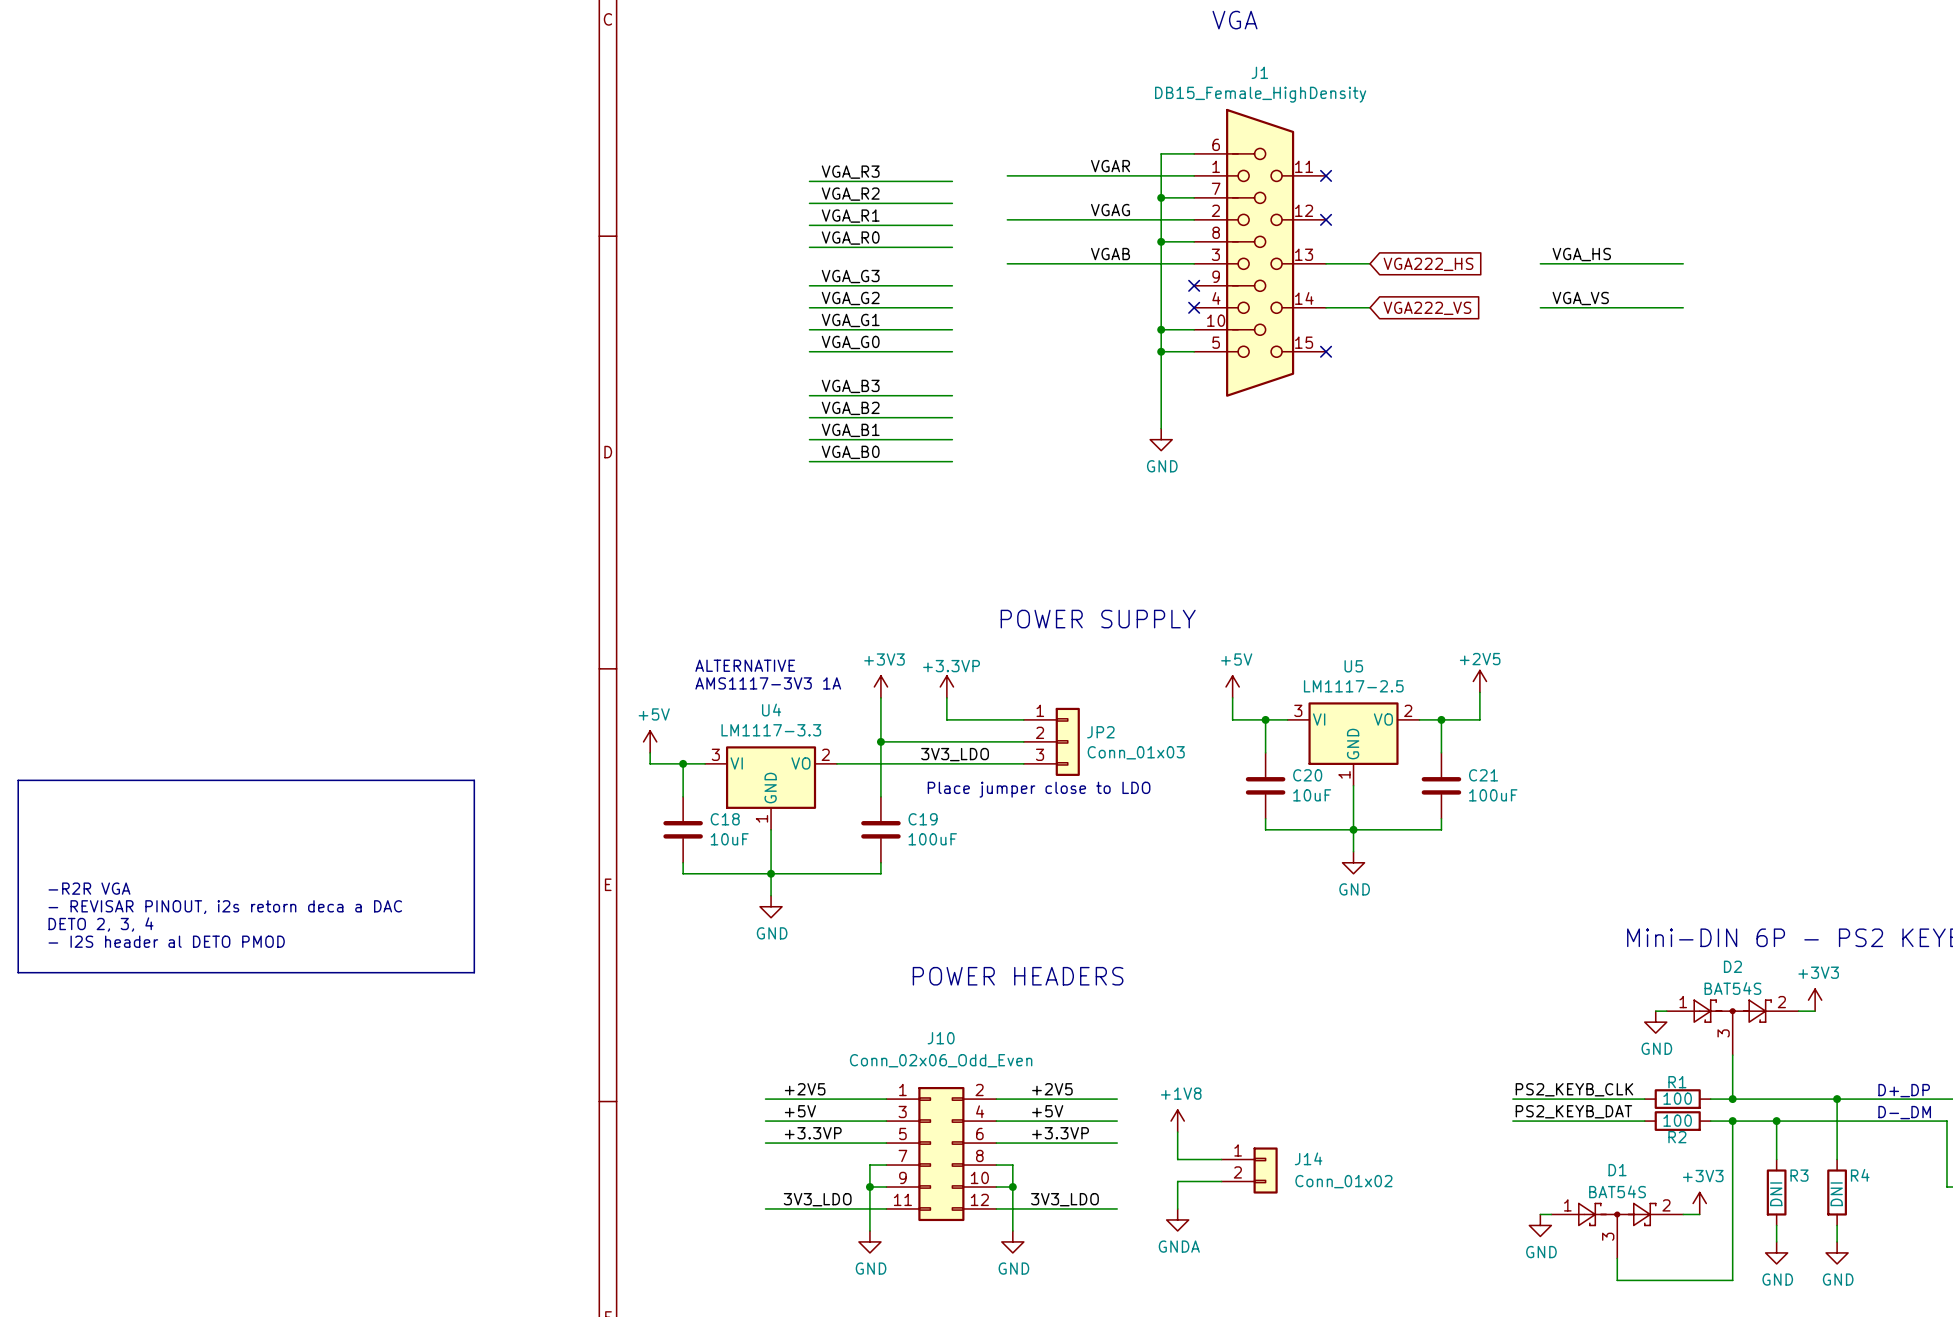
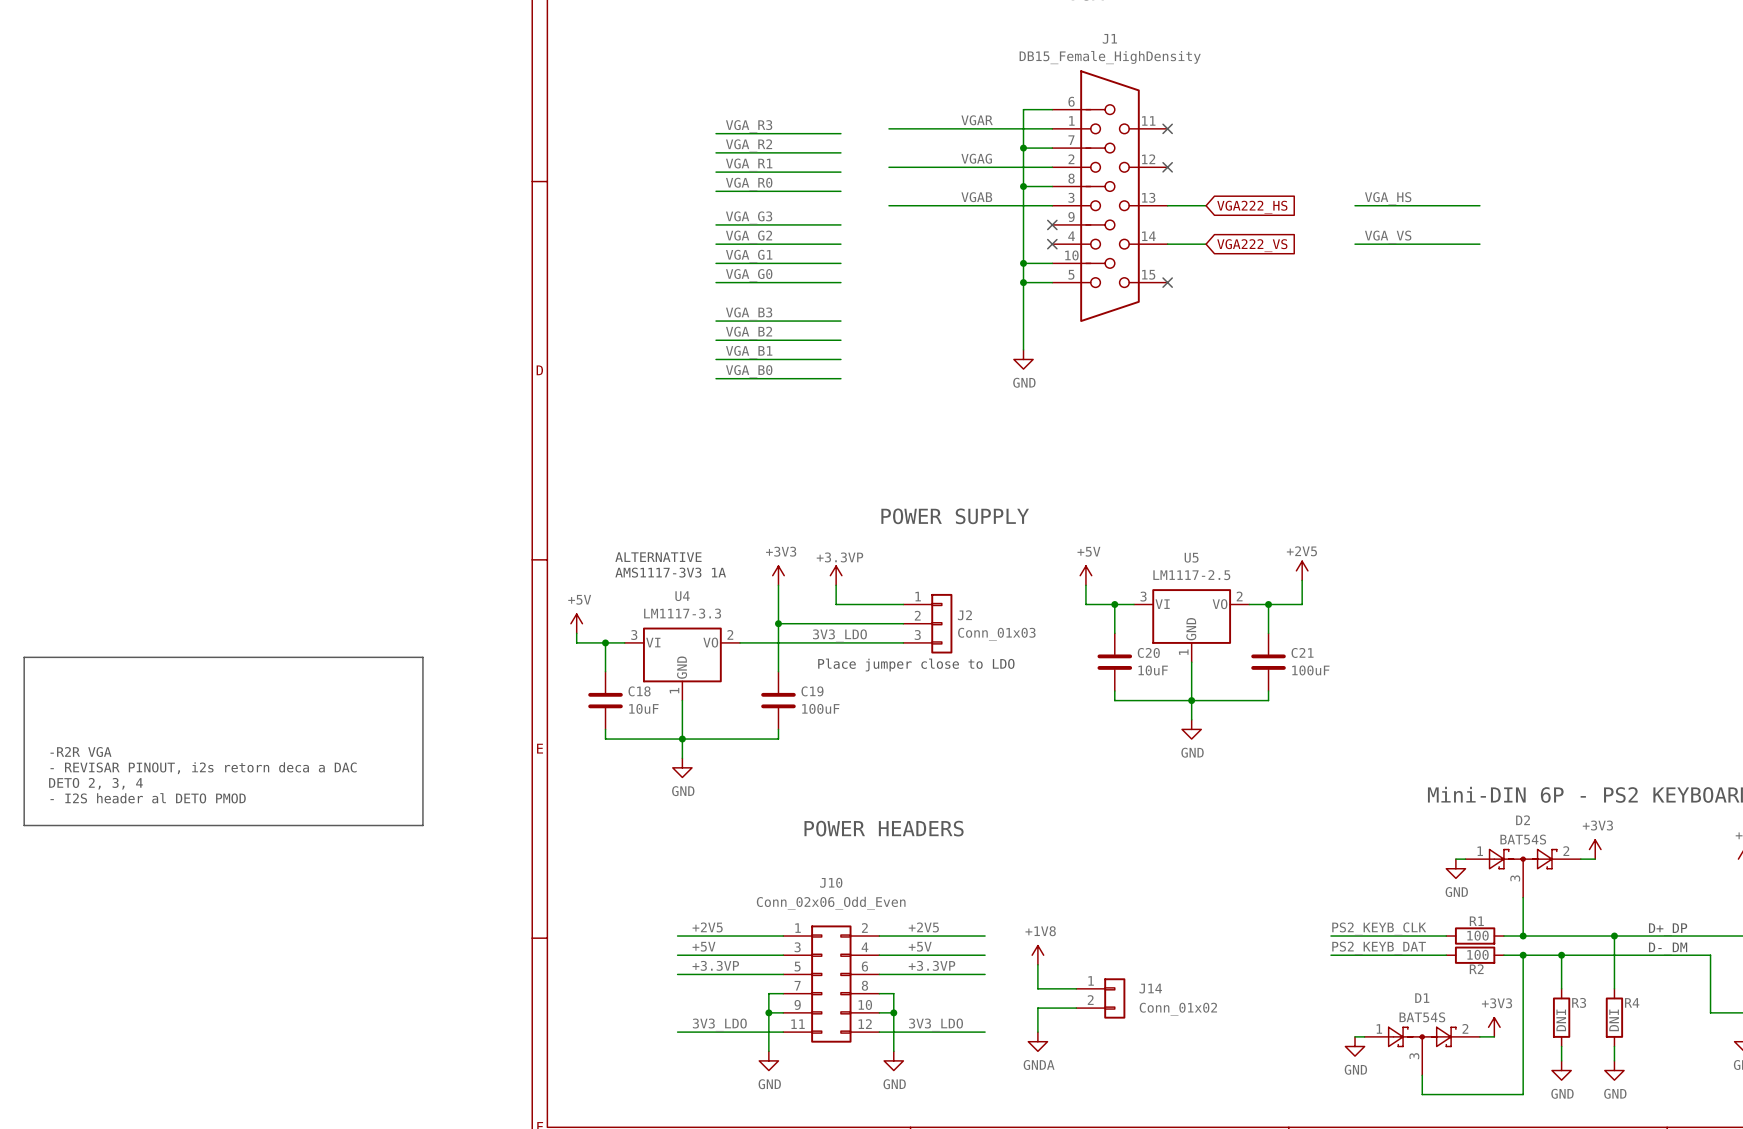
JP2 name: JP2 (1100, 732) -> J2 (964, 615)

